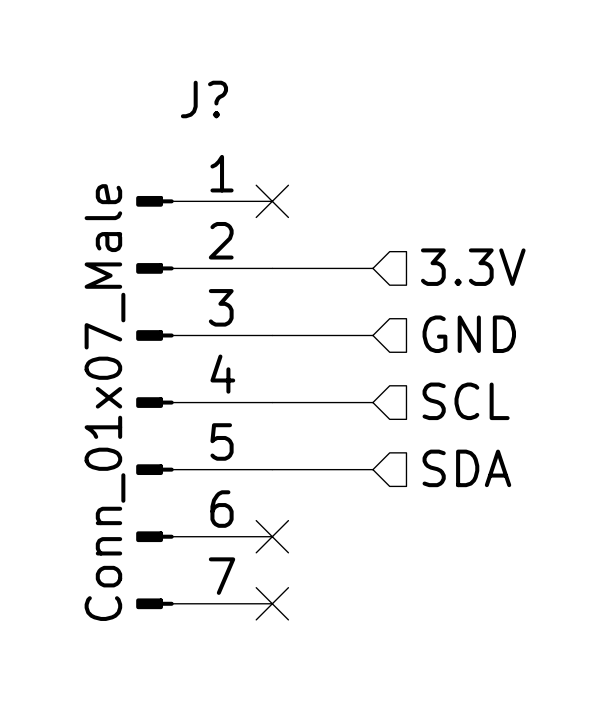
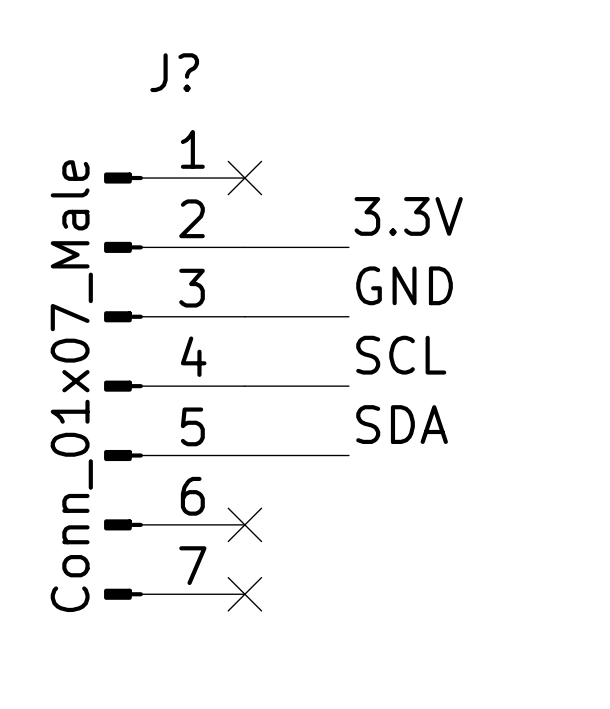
label: none -> 3.3V (408, 216)
hierarchical label: 3.3V (473, 267) -> none
label: none -> GND (404, 285)
hierarchical label: GND (469, 334) -> none
label: none -> SCL (401, 355)
hierarchical label: SCL (466, 401) -> none
label: none -> SDA (402, 424)
hierarchical label: SDA (466, 468) -> none

